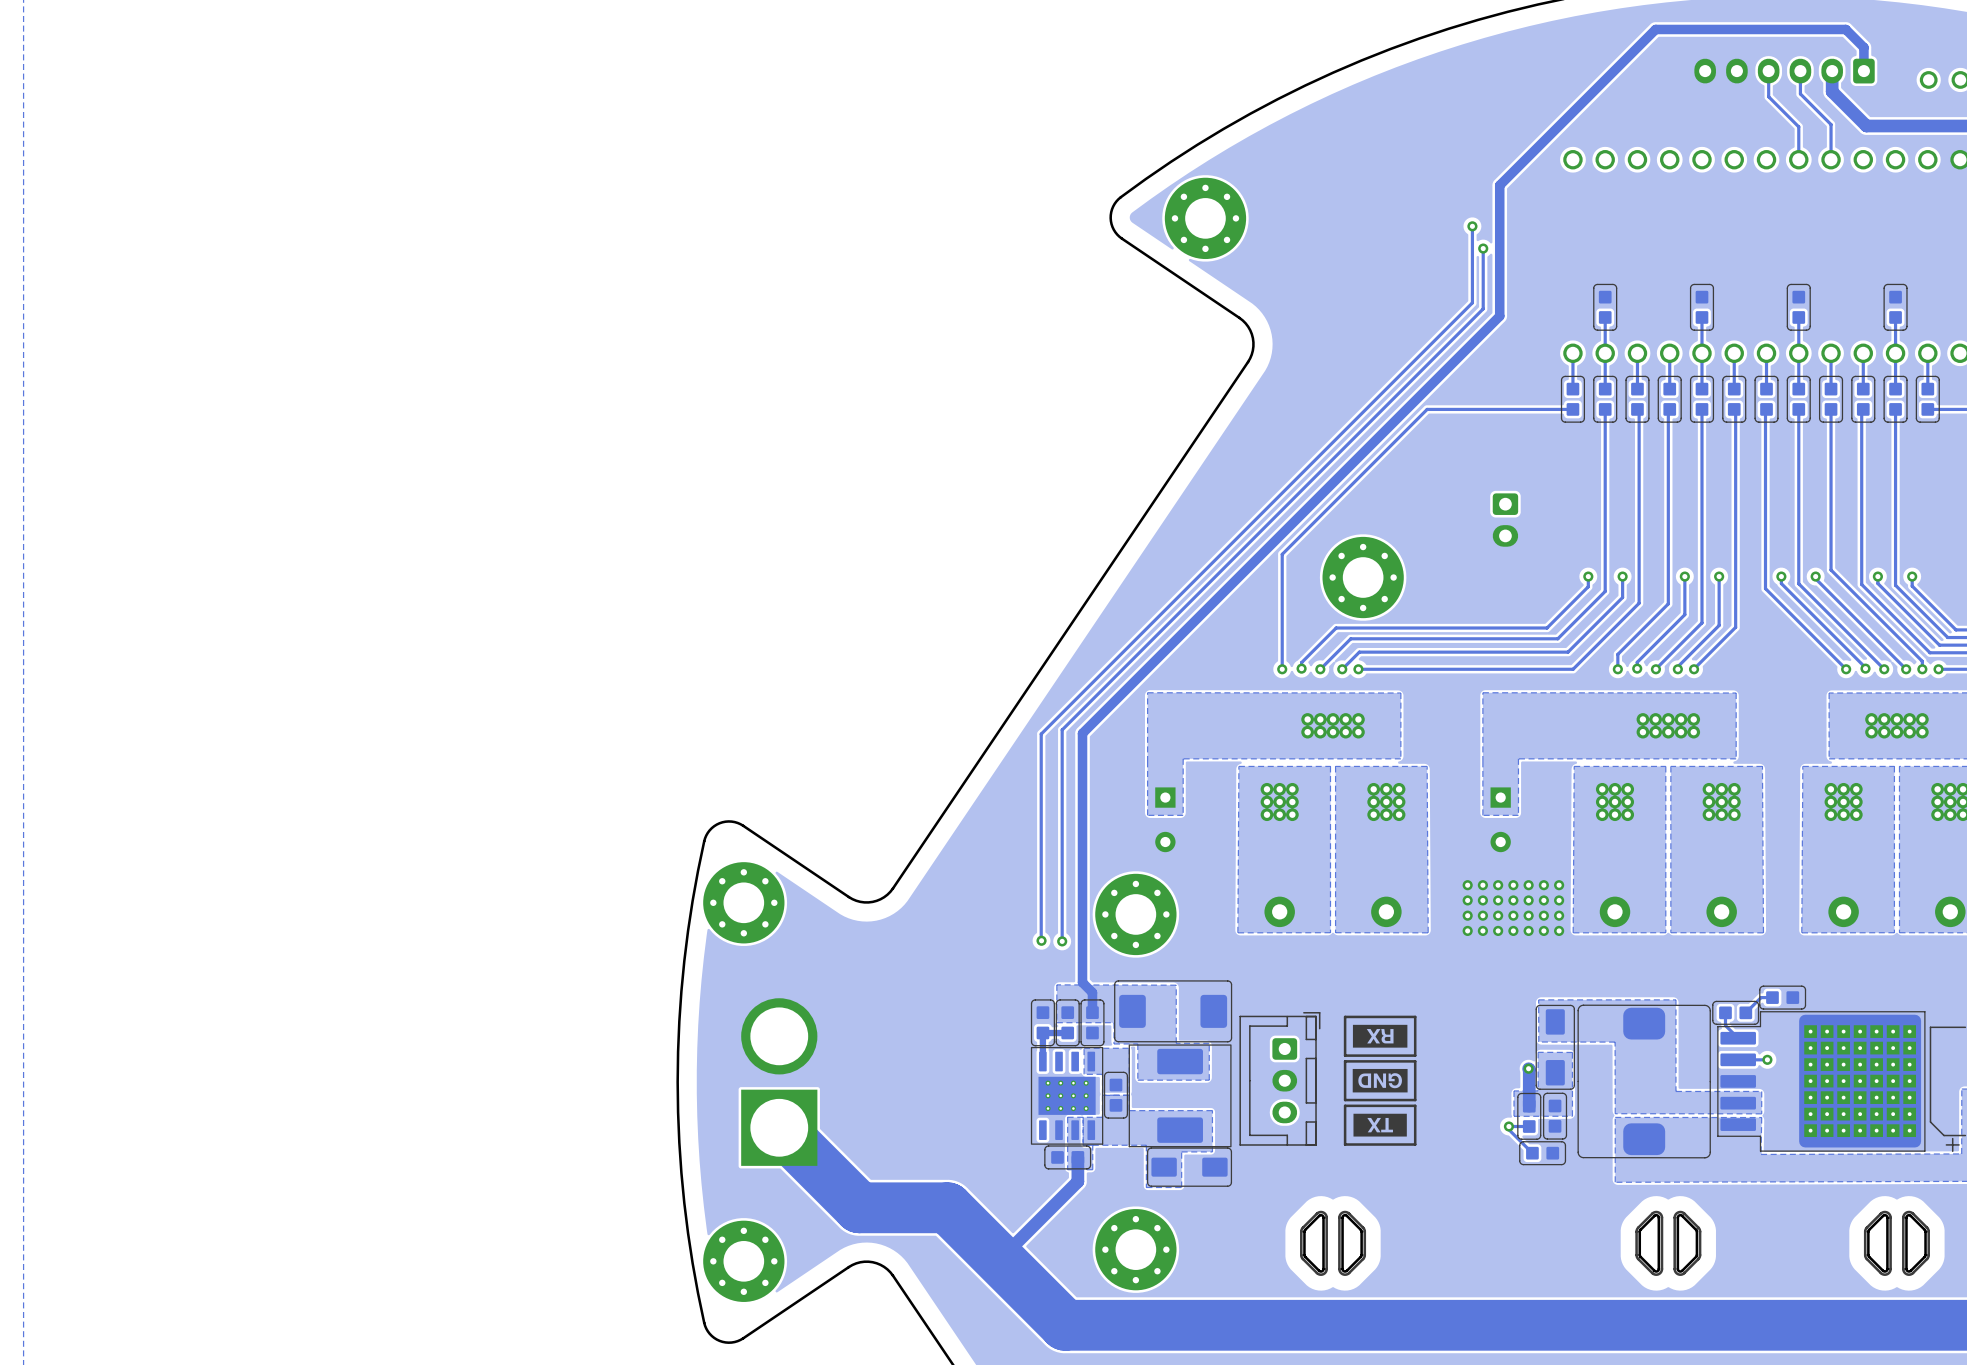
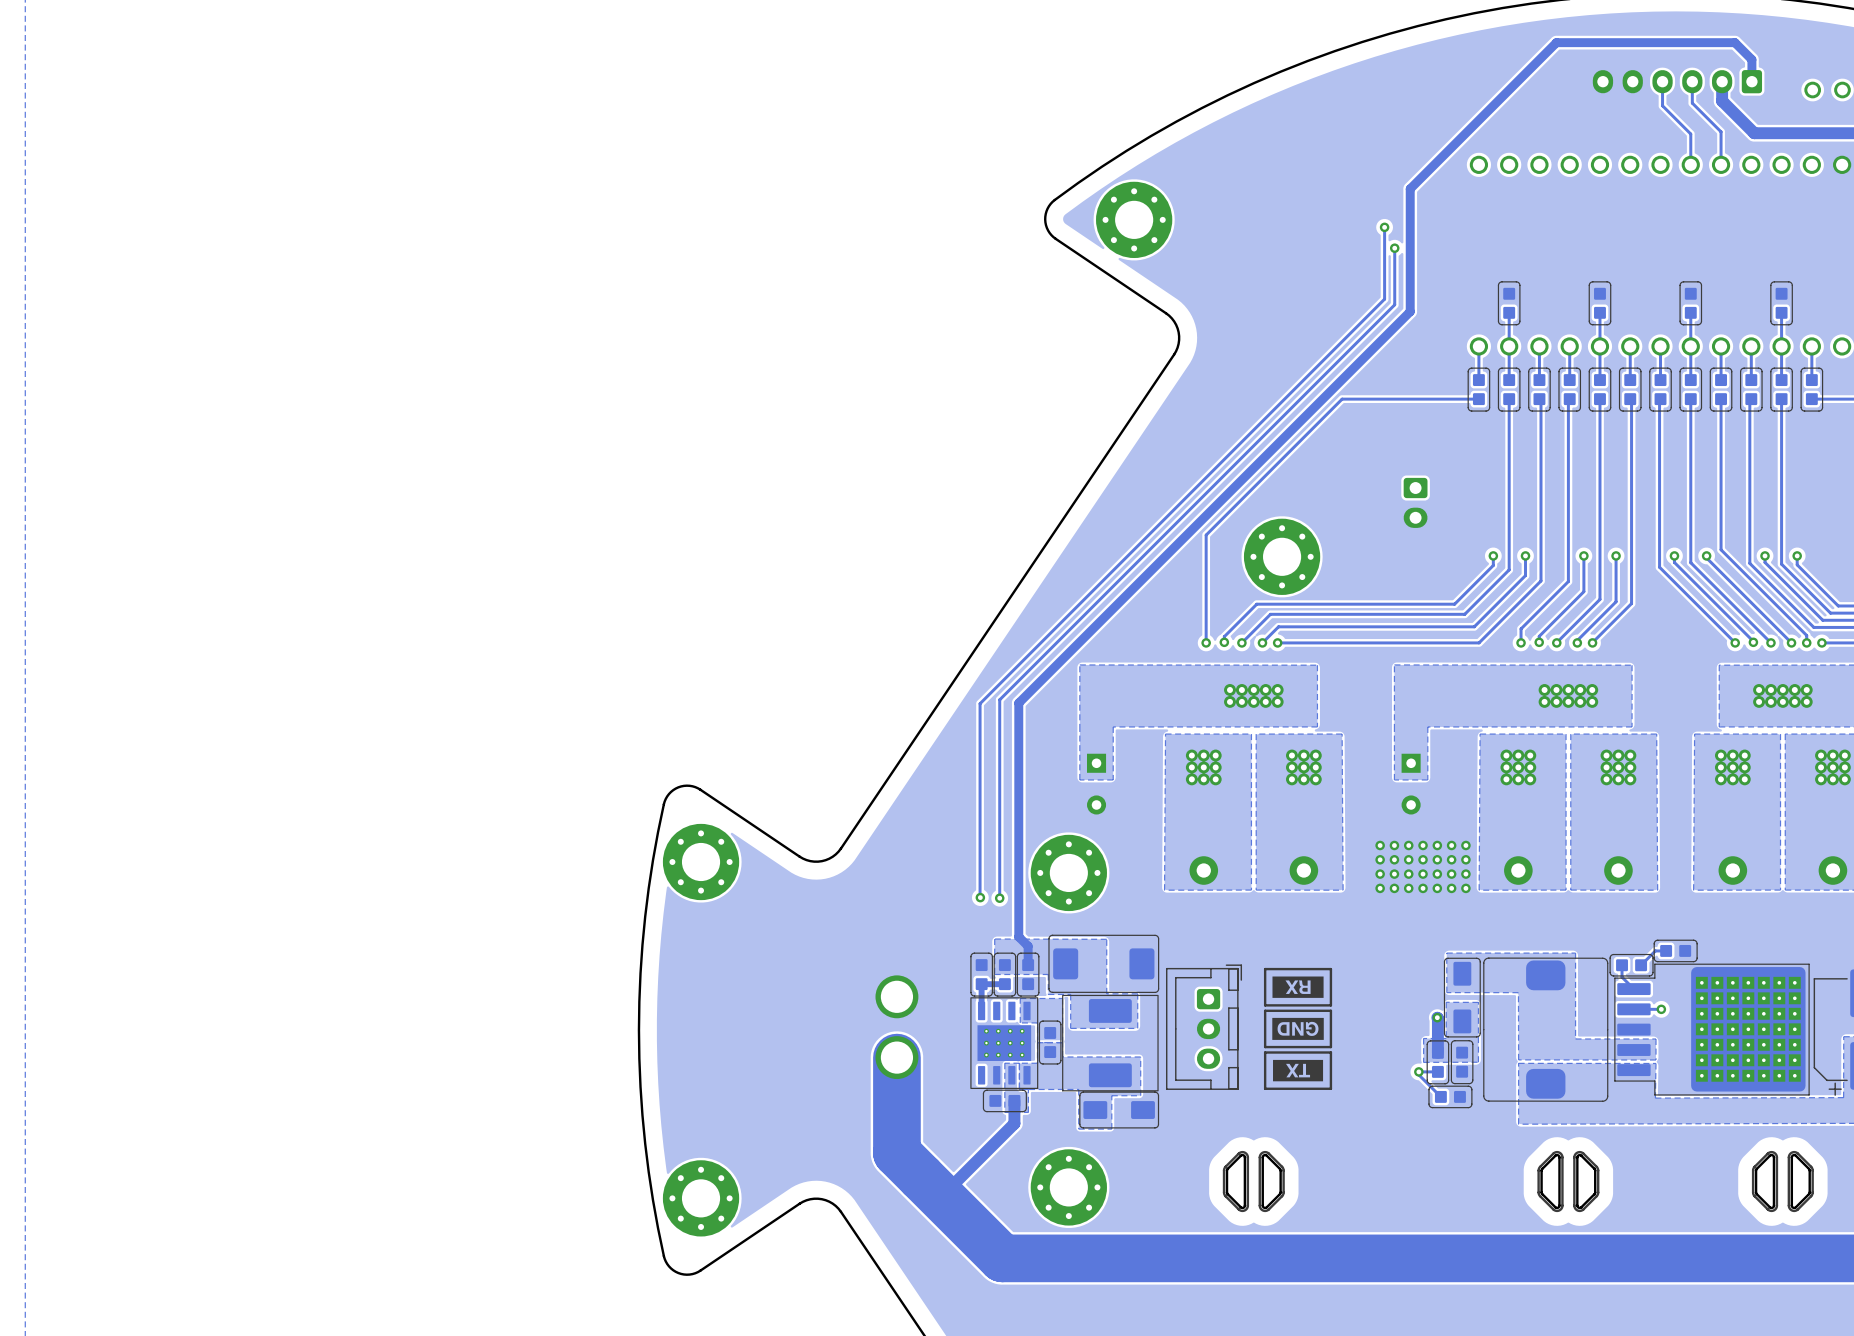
part: none -> (896, 996)
part: (779, 1082) -> none
part: none -> (896, 1057)
track: (779, 1127) (859, 1207) (947, 1207) (952, 1212) -> (896, 1057) (896, 1152)

